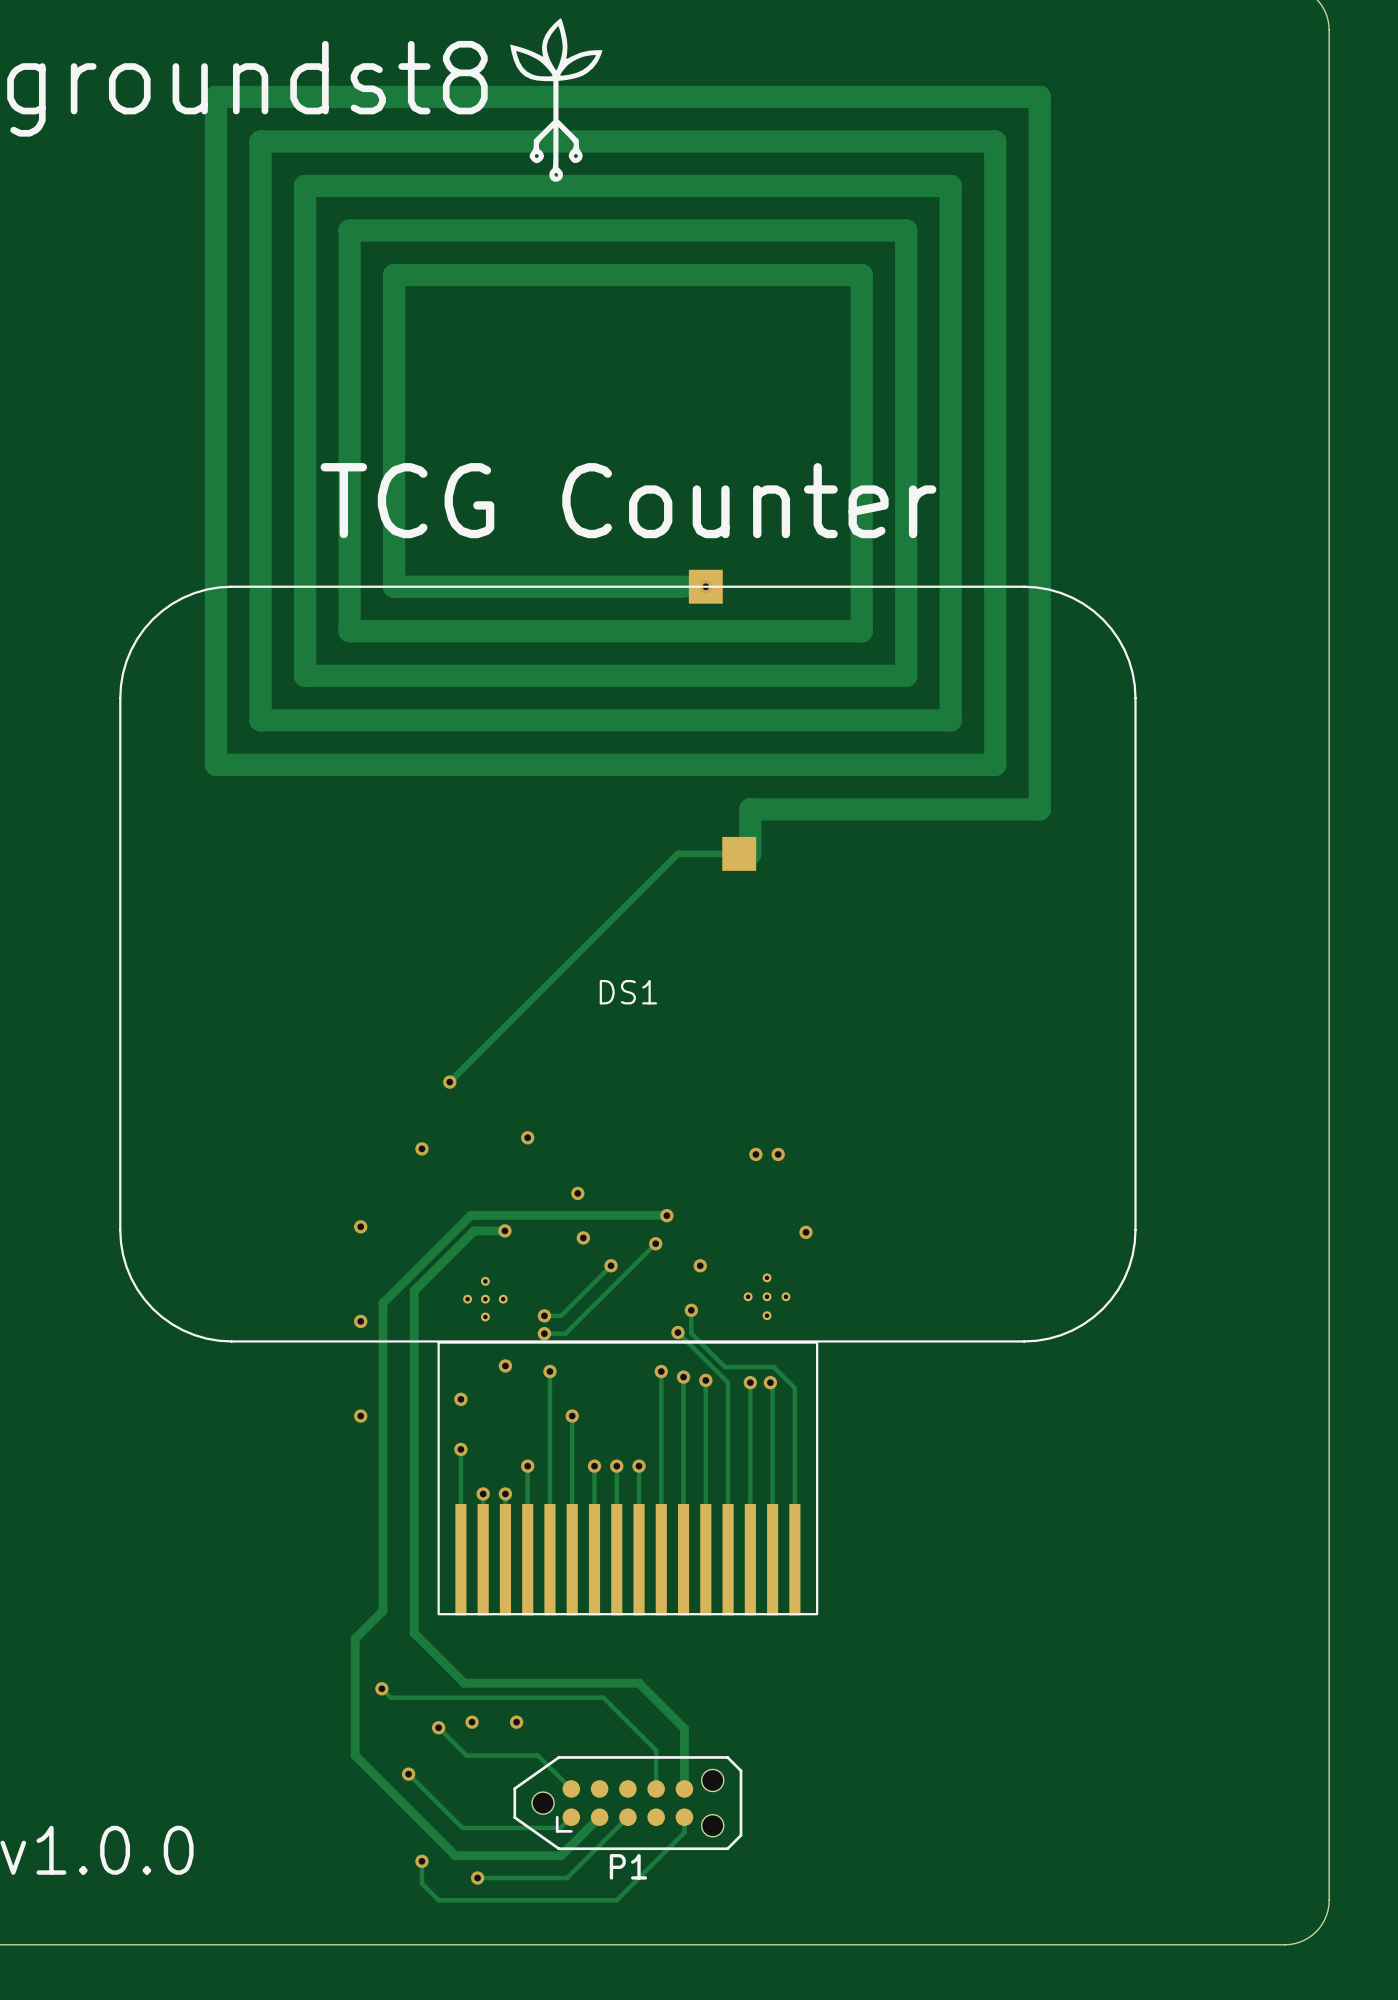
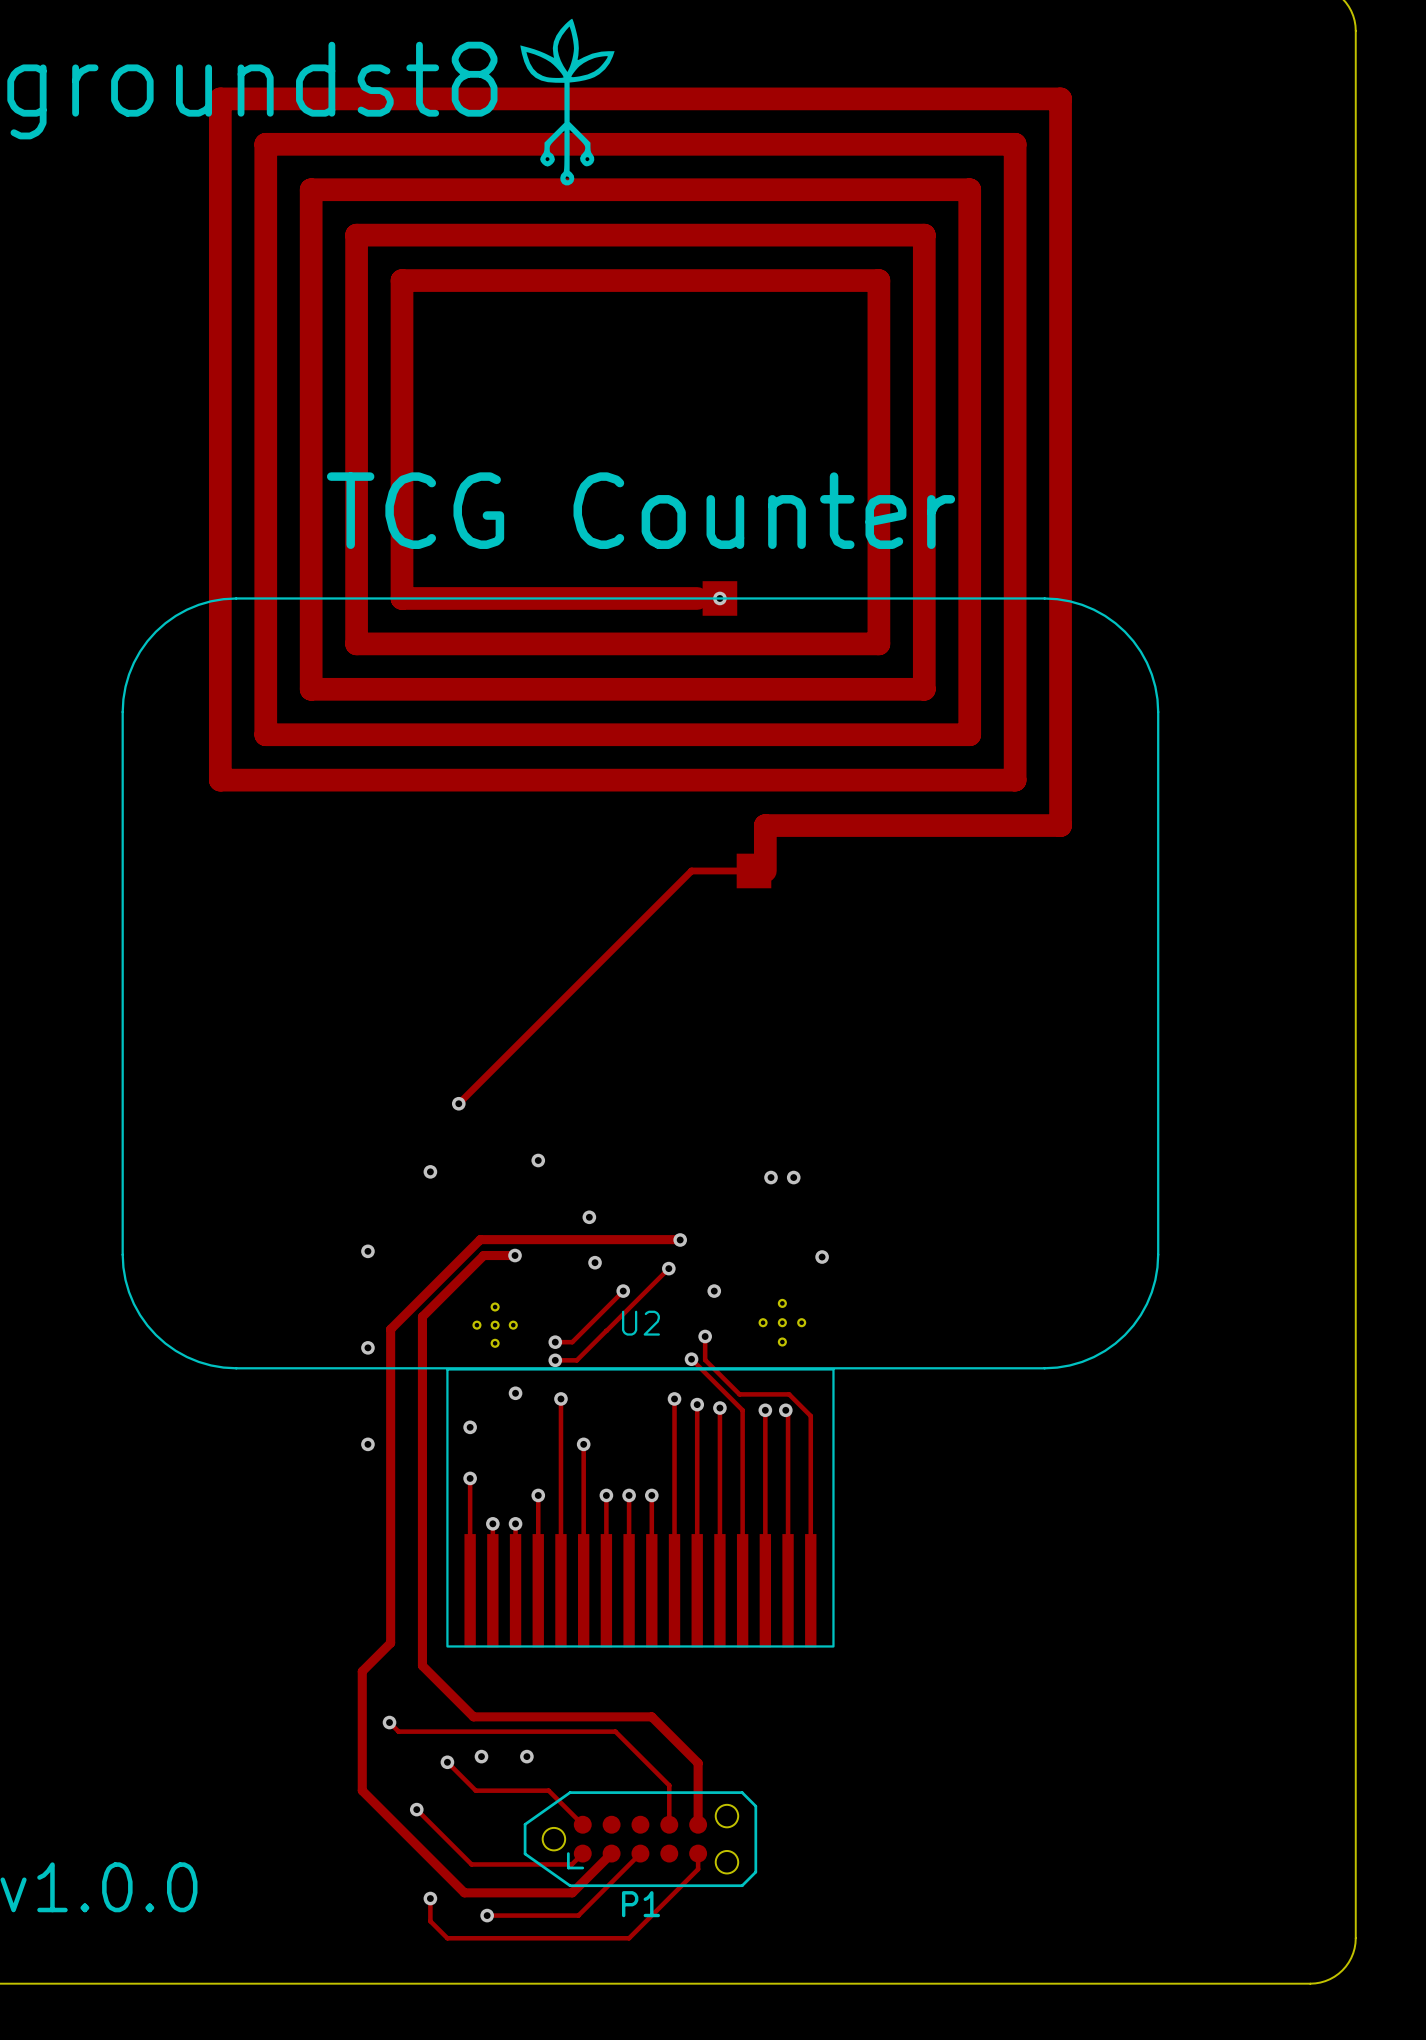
DS1 name: DS1 (628, 992) -> U2 (640, 1323)

